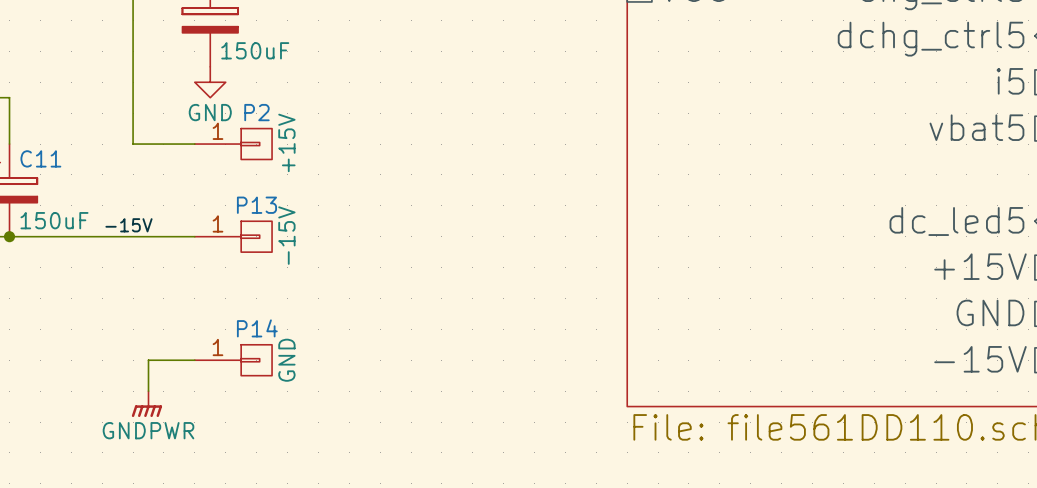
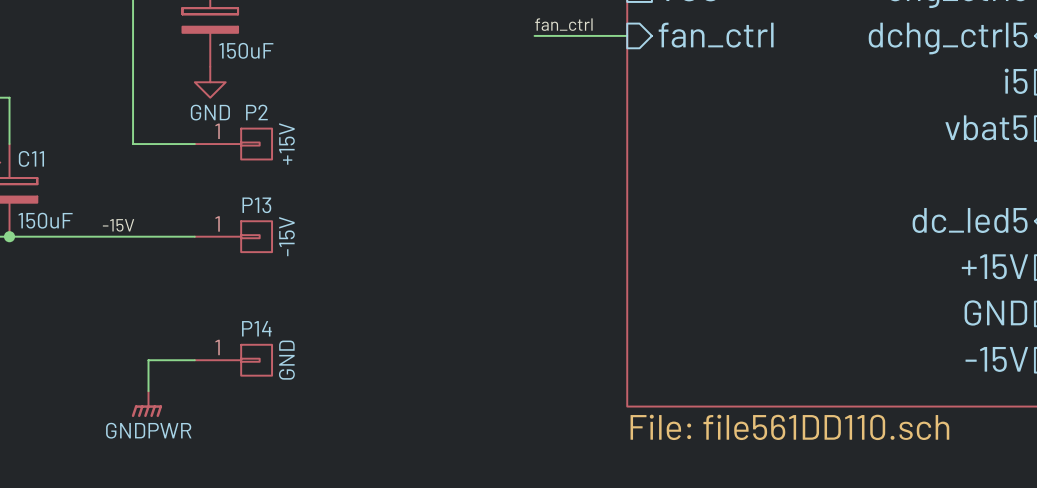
label: none -> fan_ctrl (563, 24)
wire: none -> (534, 35) (627, 35)
sheet pin: none -> fan_ctrl (716, 35)

